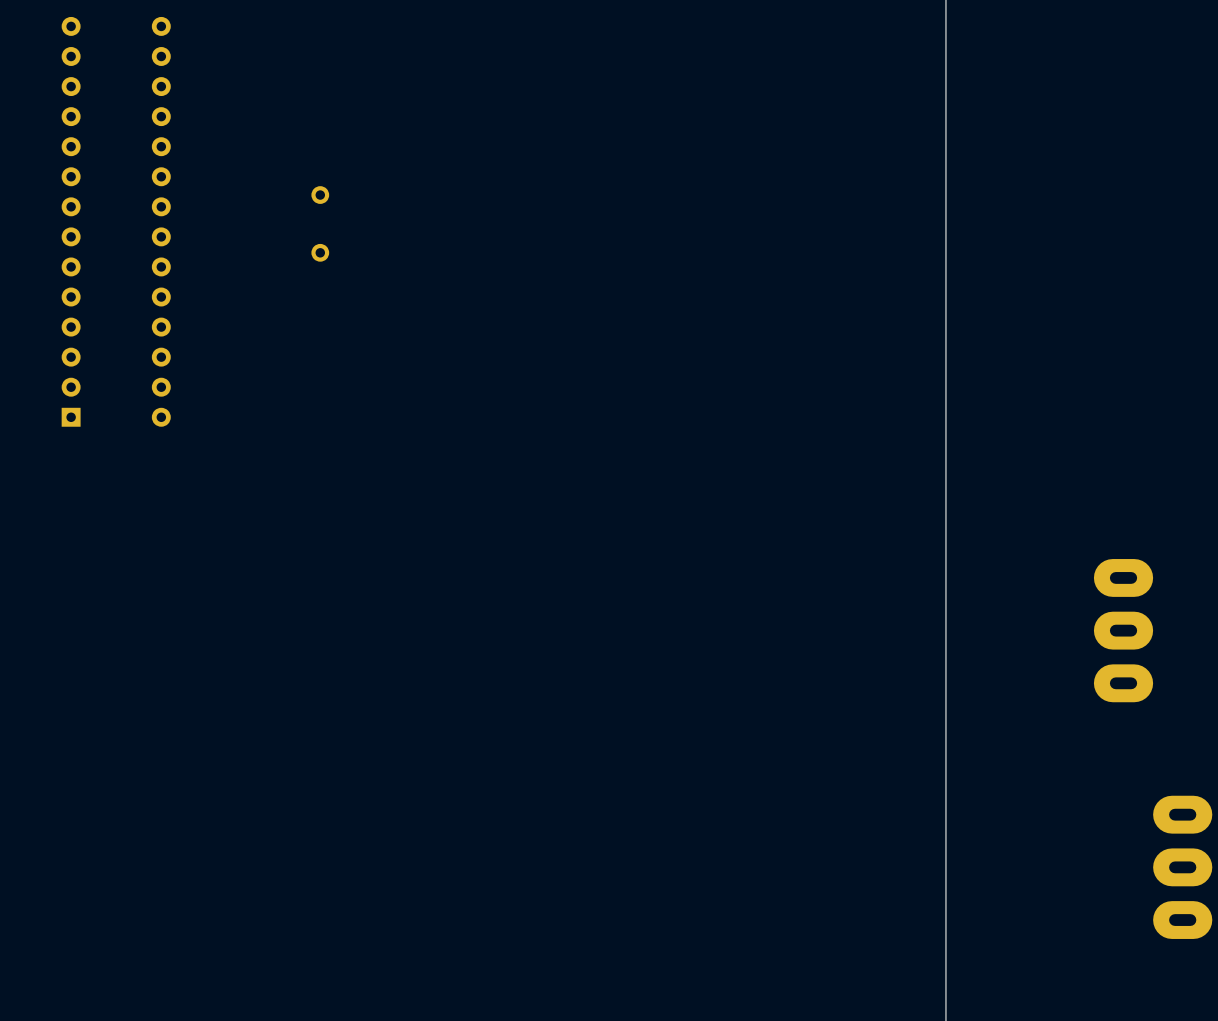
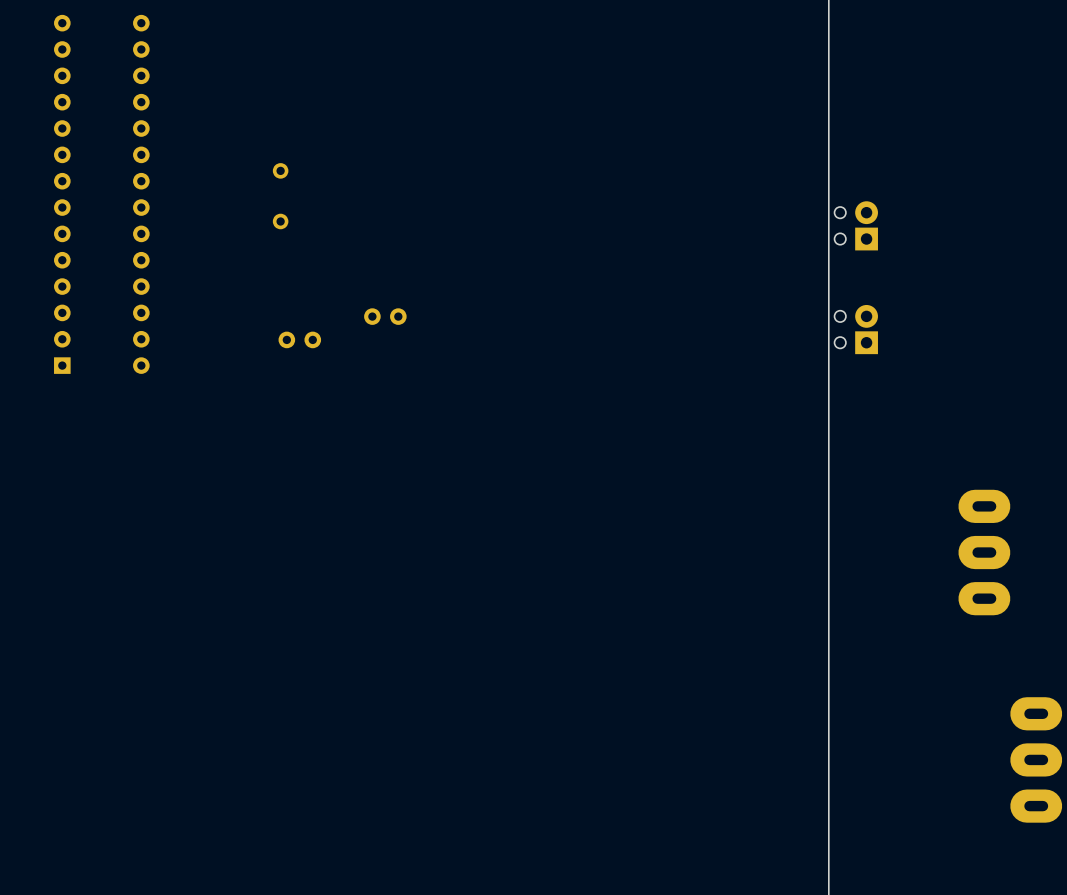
part: none -> (856, 225)
part: none -> (385, 316)
part: none -> (856, 329)
part: none -> (299, 339)

